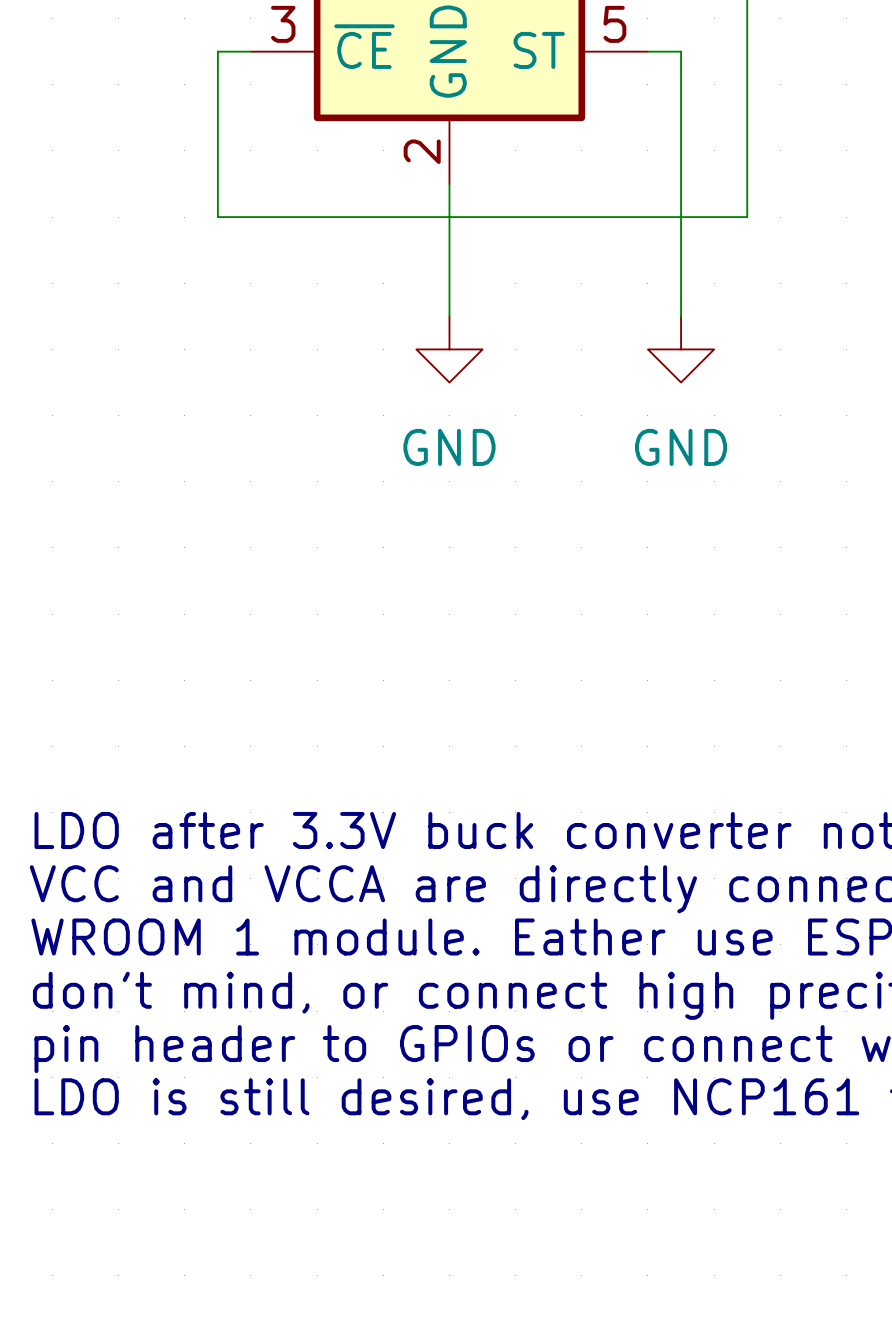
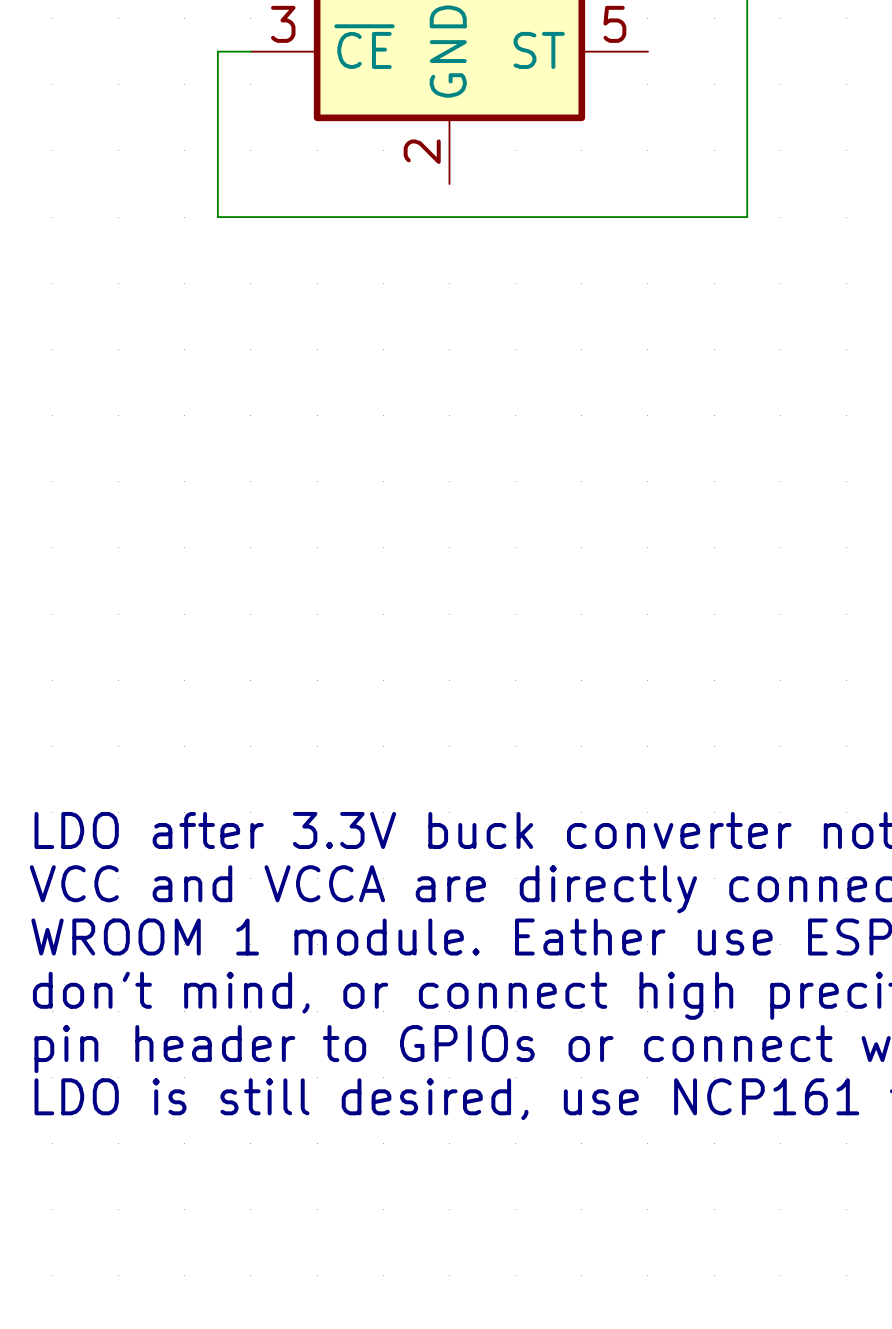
wire: (647, 51) (681, 51) (681, 316) -> none
wire: (449, 183) (449, 316) -> none
power symbol: GND (449, 349) -> none
power symbol: GND (681, 349) -> none

